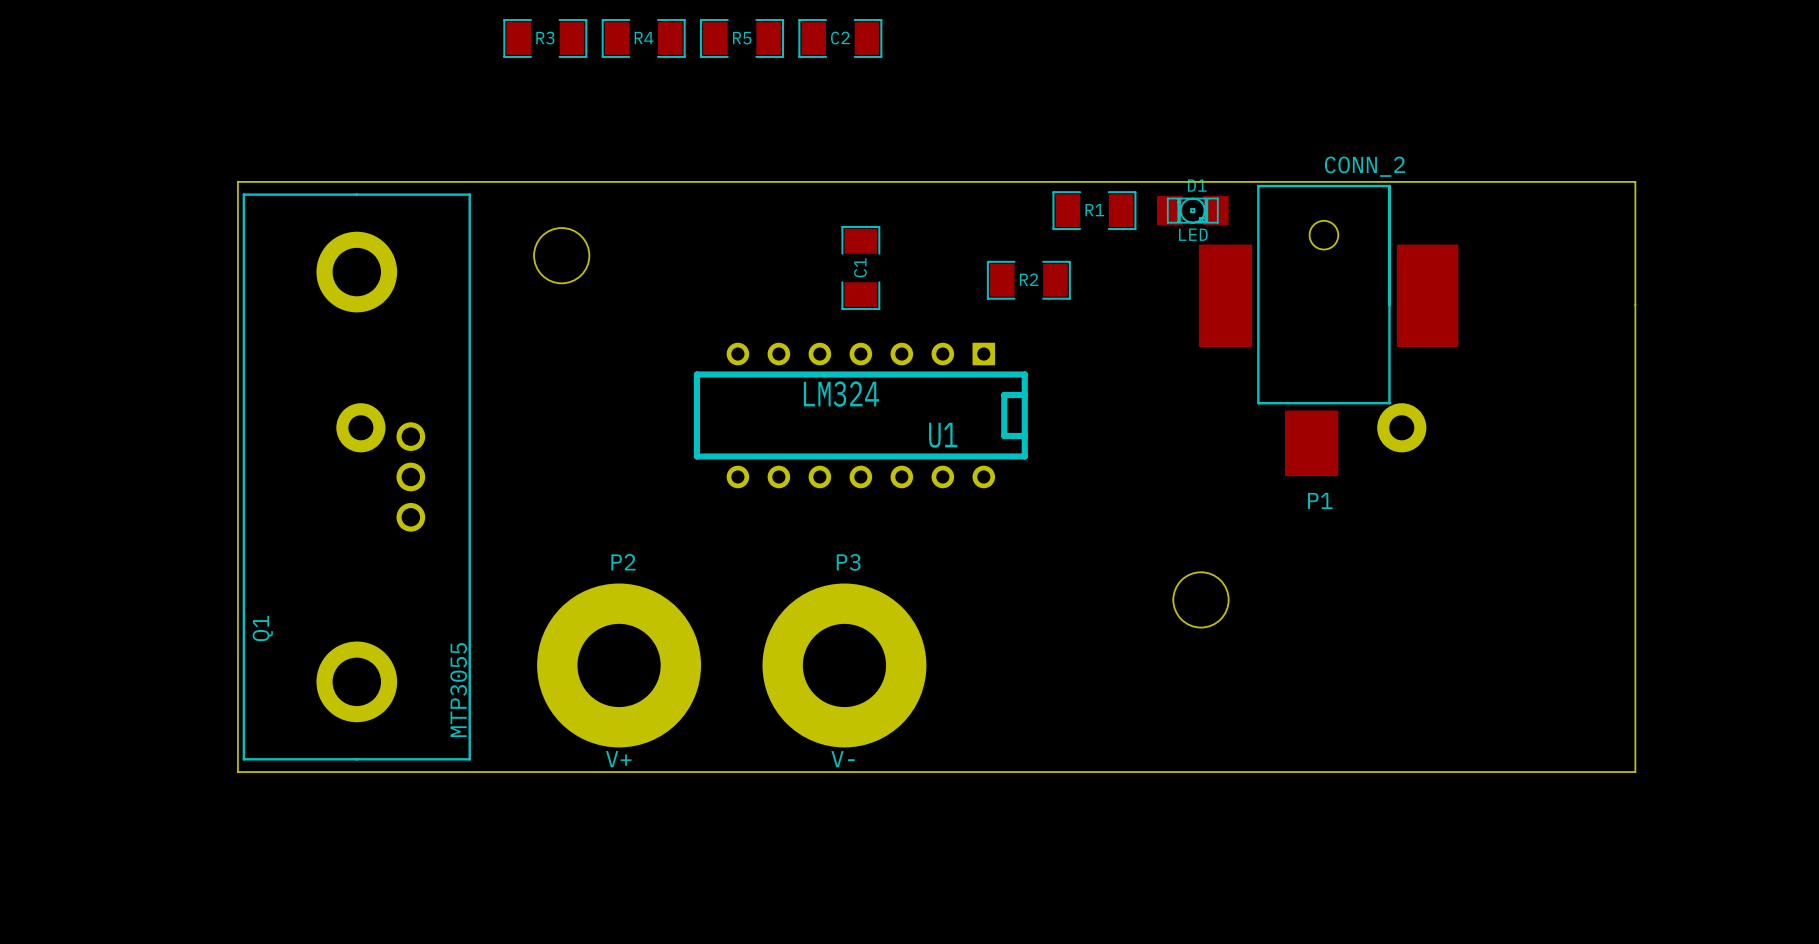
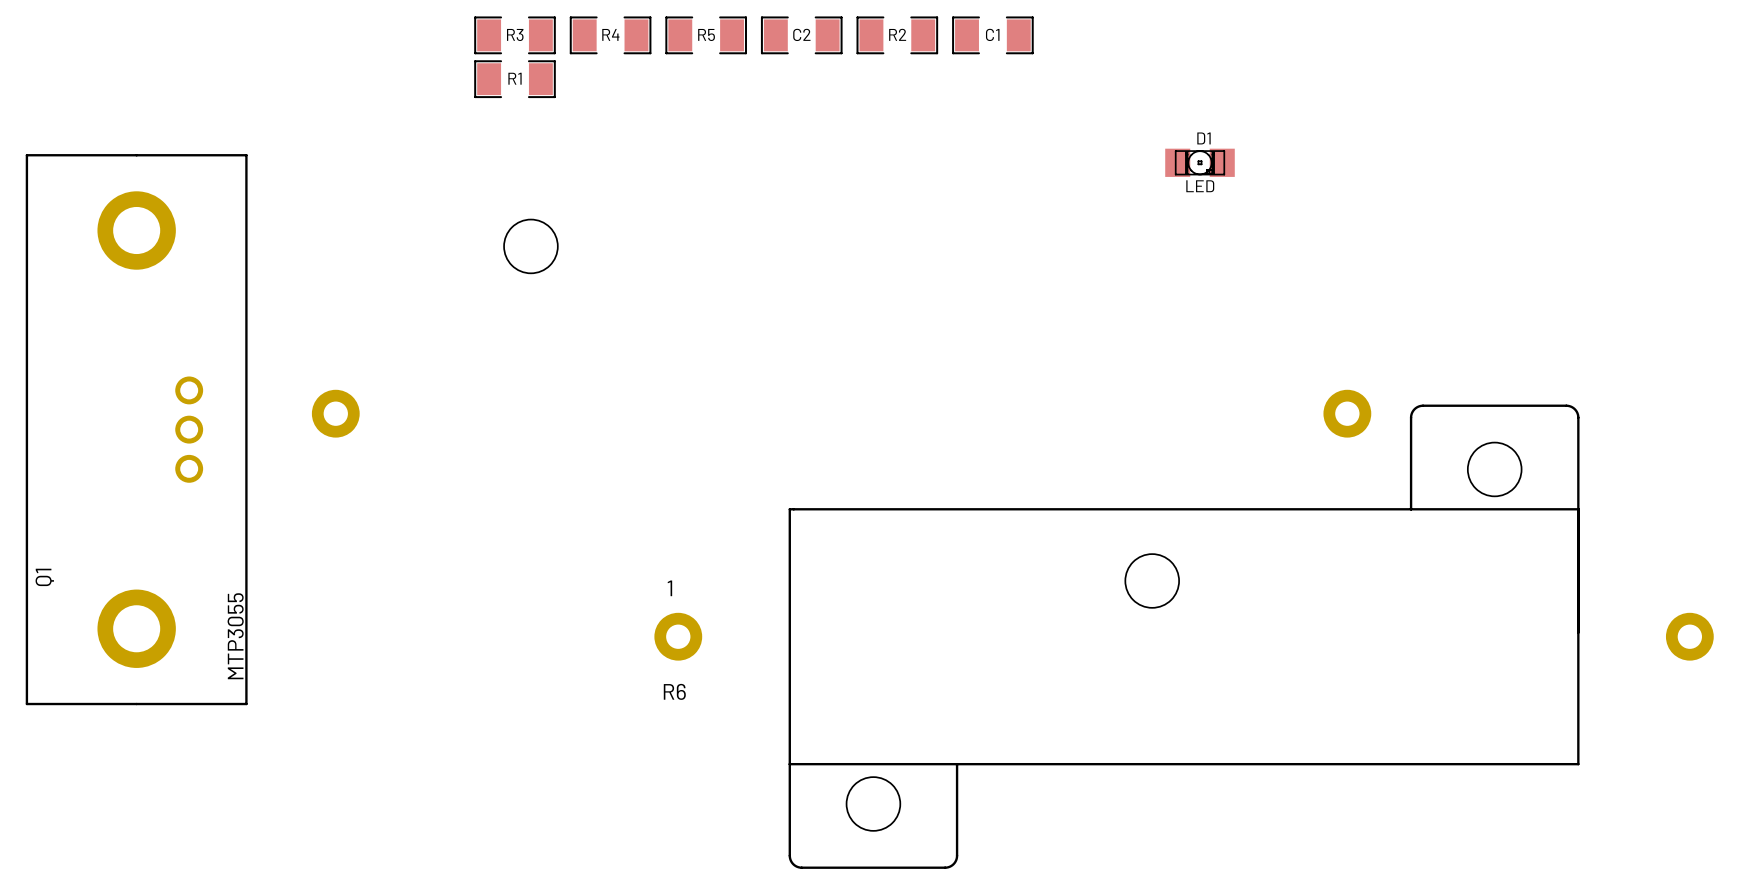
board edge: (237, 181) (1635, 181) (1635, 772) (237, 772) (237, 181) -> none
R1 position: (1094, 210) -> (515, 79)
D1 position: (1192, 210) -> (1200, 162)
C1 rotation: 0° (860, 267) -> 90° clockwise (992, 35)
C1 position: (860, 267) -> (992, 35)
R2 position: (1028, 280) -> (897, 35)
P1: CONN_2 (1328, 330) -> none
U1: LM324 (860, 415) -> none
Q1 position: (356, 476) -> (136, 429)
R6: none -> 1 (1184, 636)
P2: V+ (619, 665) -> none
P3: V- (844, 665) -> none

